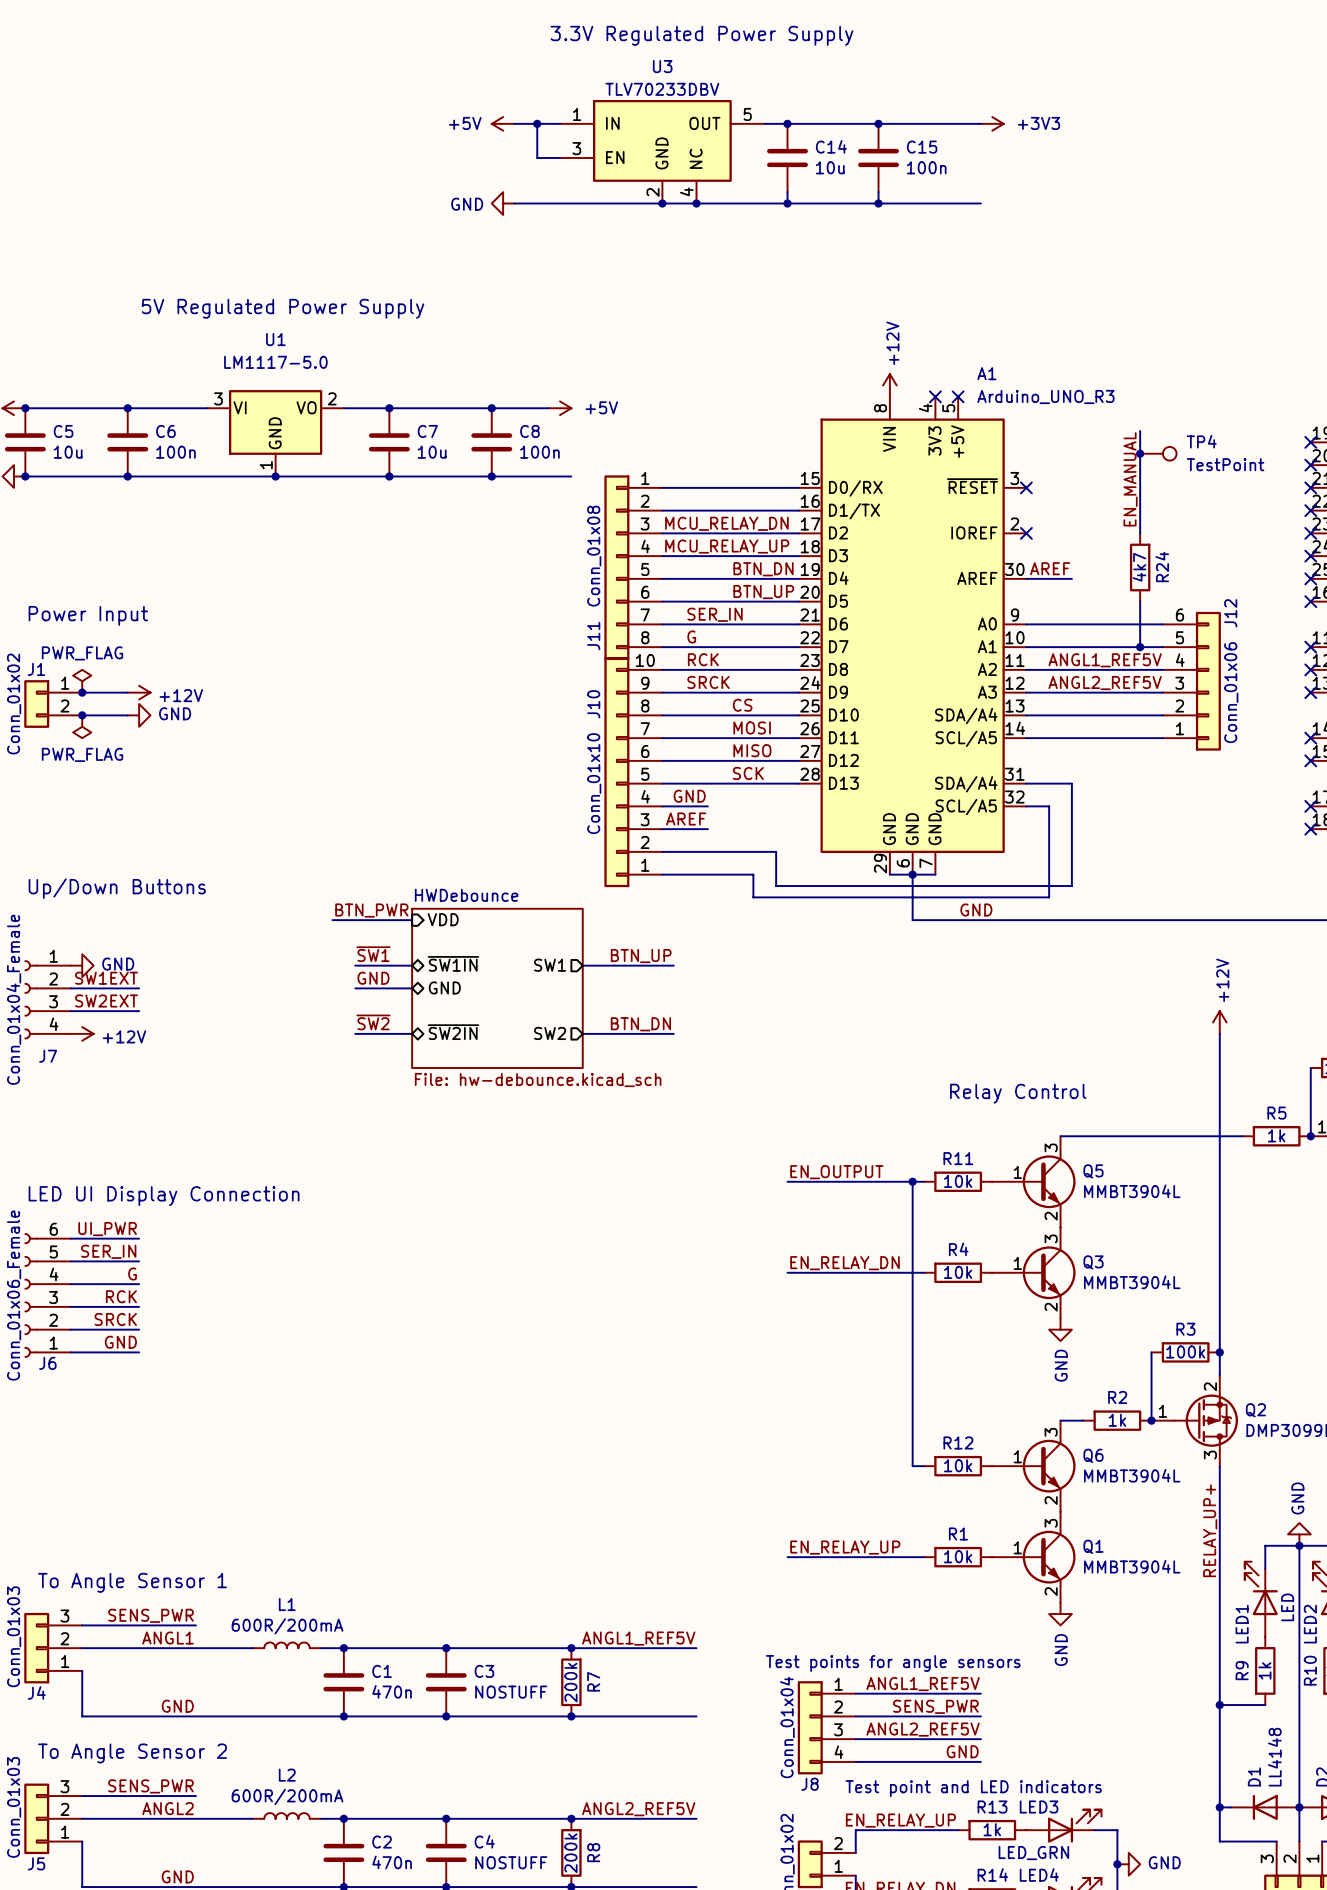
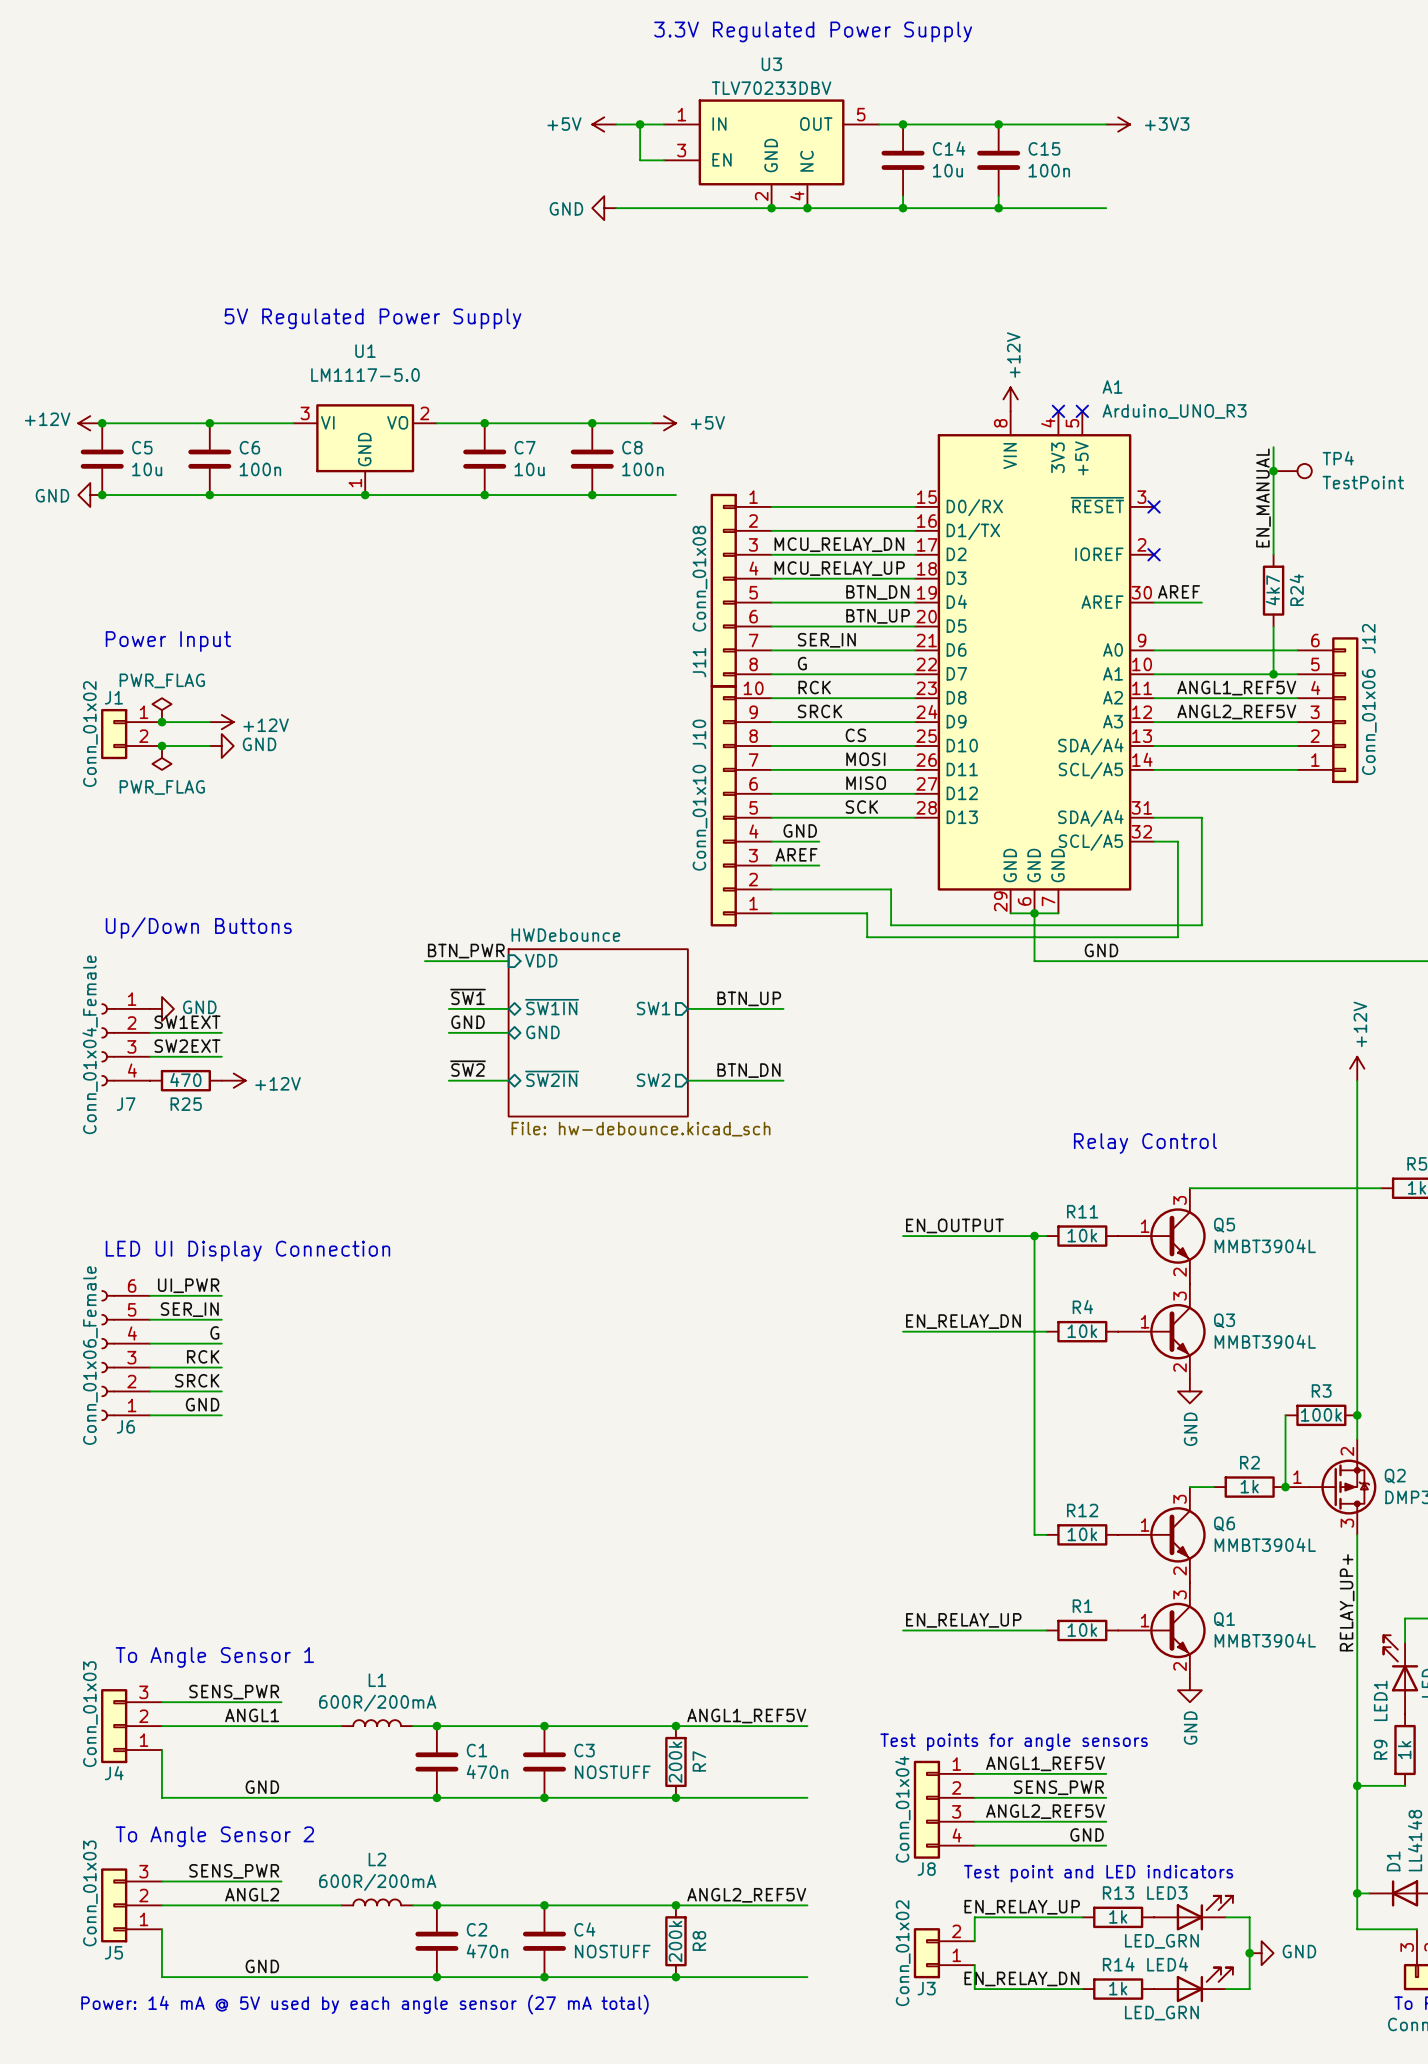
power symbol position: +12V (82, 1033) -> +12V (233, 1080)
R25: none -> 470 (185, 1080)

